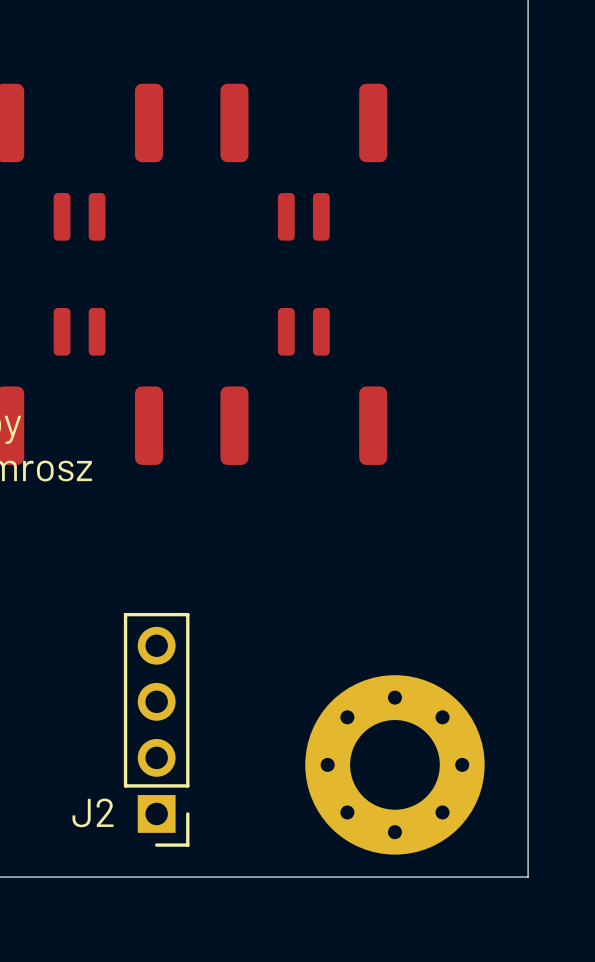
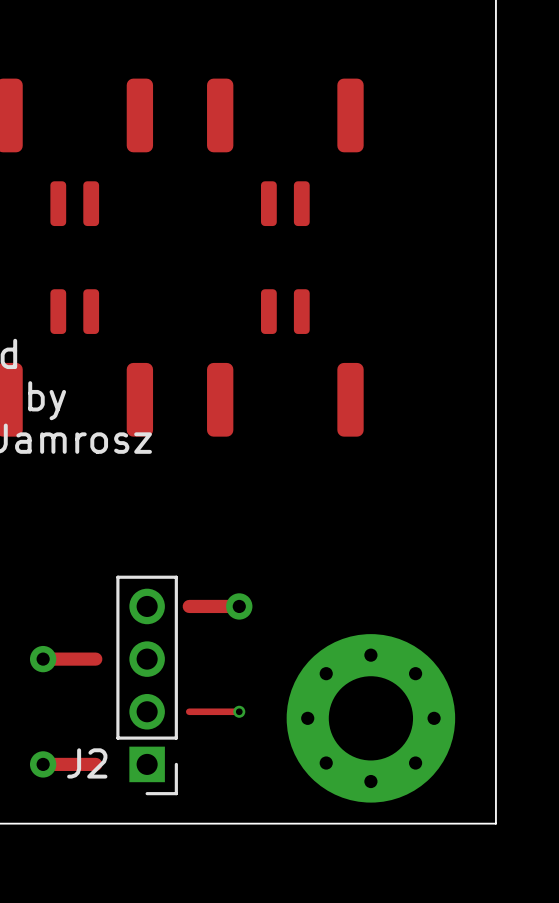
top track: none -> (239, 606) (189, 606)
via: none -> (239, 606)
via: none -> (43, 659)
top track: none -> (95, 659) (43, 659)
top track: none -> (239, 711) (189, 711)
via: none -> (239, 711)
via: none -> (43, 764)
top track: none -> (95, 764) (43, 764)

